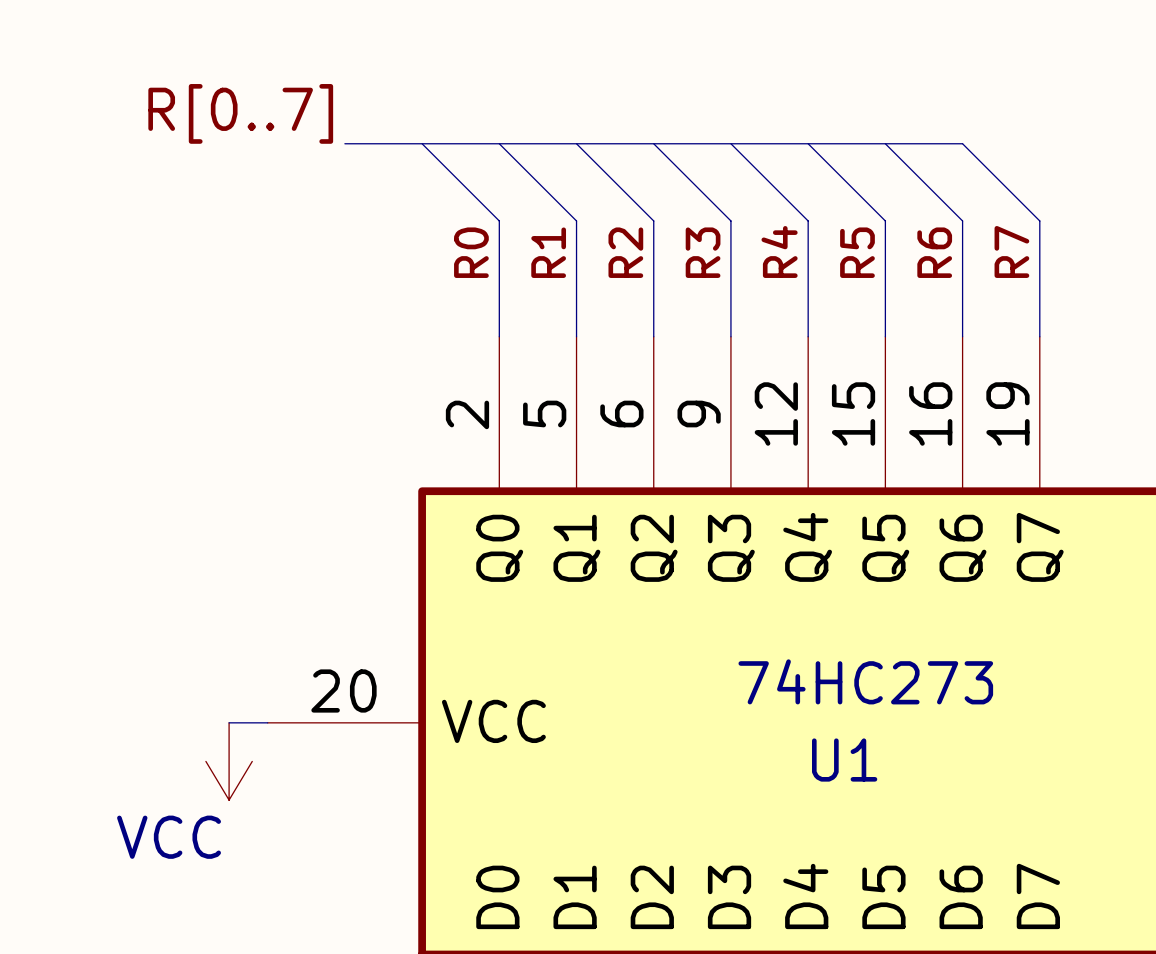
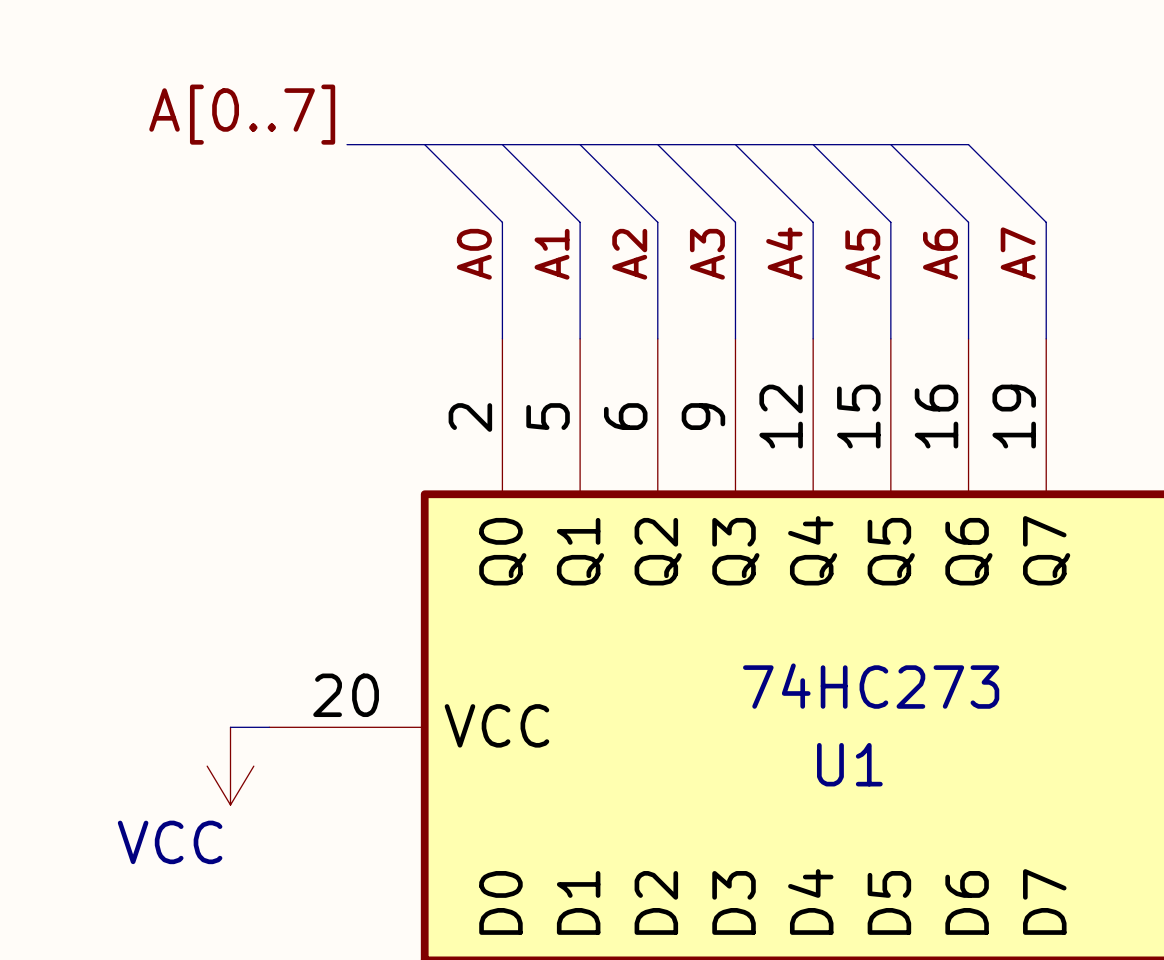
label: R[0..7] (240, 113) -> A[0..7] (242, 114)
label: R4 (779, 251) -> A4 (784, 253)
label: R7 (1011, 251) -> A7 (1018, 253)
label: R0 (471, 252) -> A0 (474, 254)
label: R1 (548, 252) -> A1 (552, 254)
label: R2 (625, 252) -> A2 (629, 254)
label: R3 (703, 252) -> A3 (707, 254)
label: R5 (857, 252) -> A5 (862, 254)
label: R6 (934, 252) -> A6 (940, 254)

